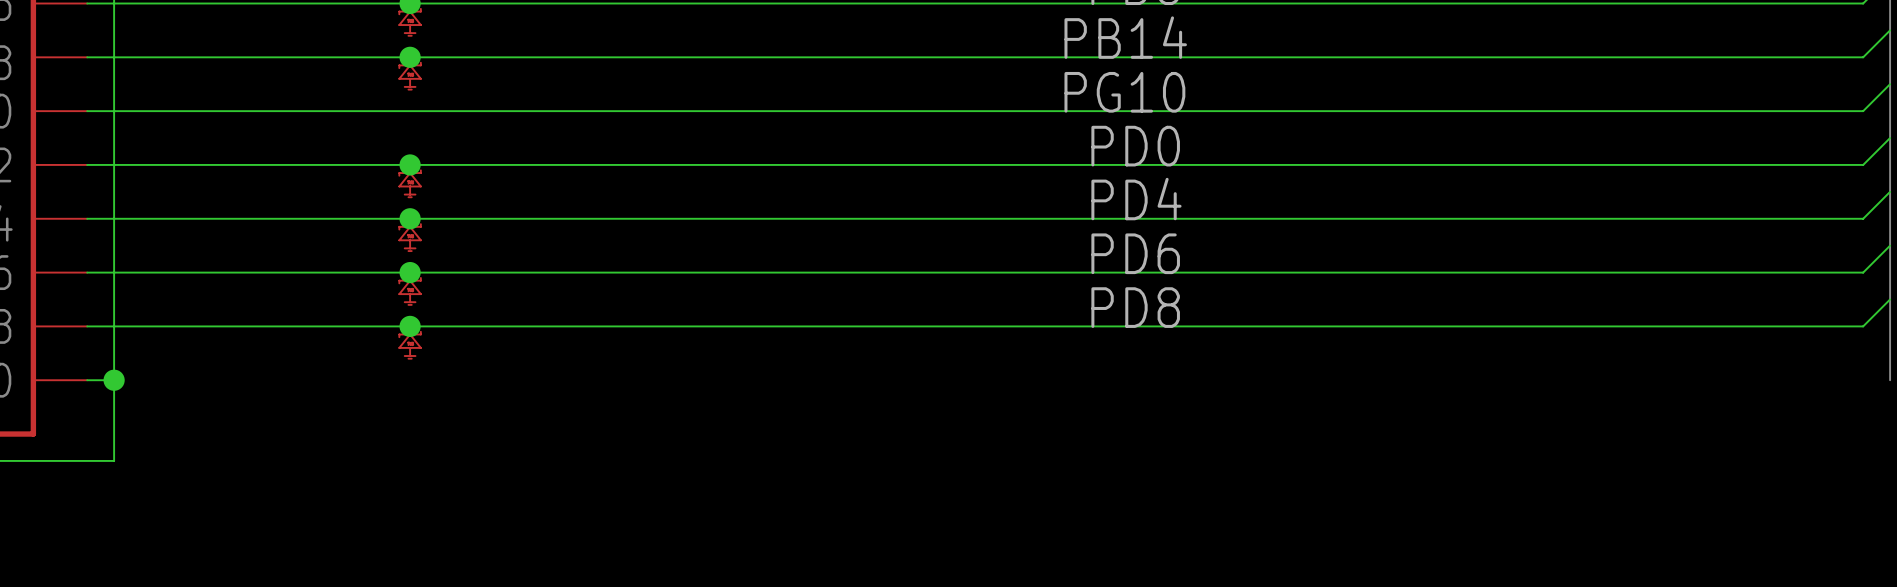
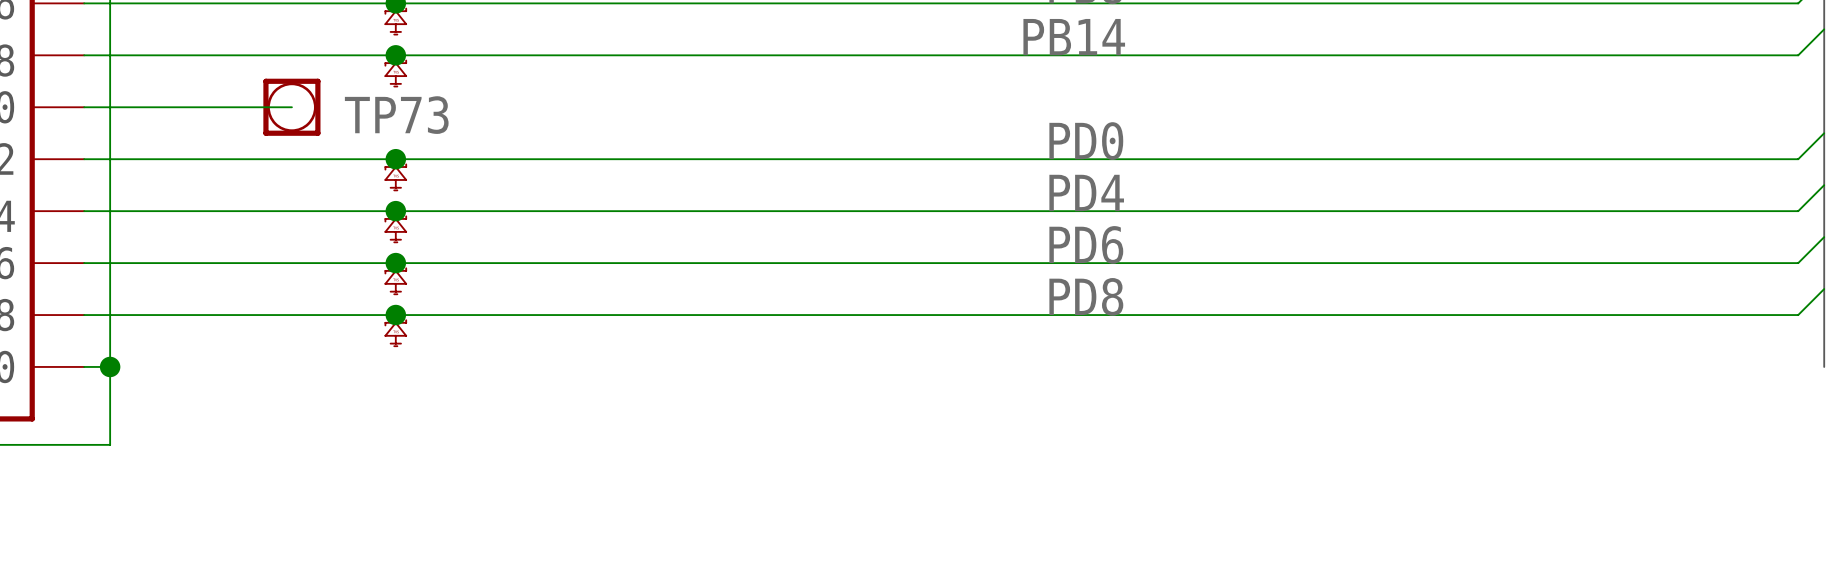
wire: (1890, 84) (1863, 111) (302, 111) -> none
label: PG10 (1124, 92) -> none
TP73: none -> (291, 107)

